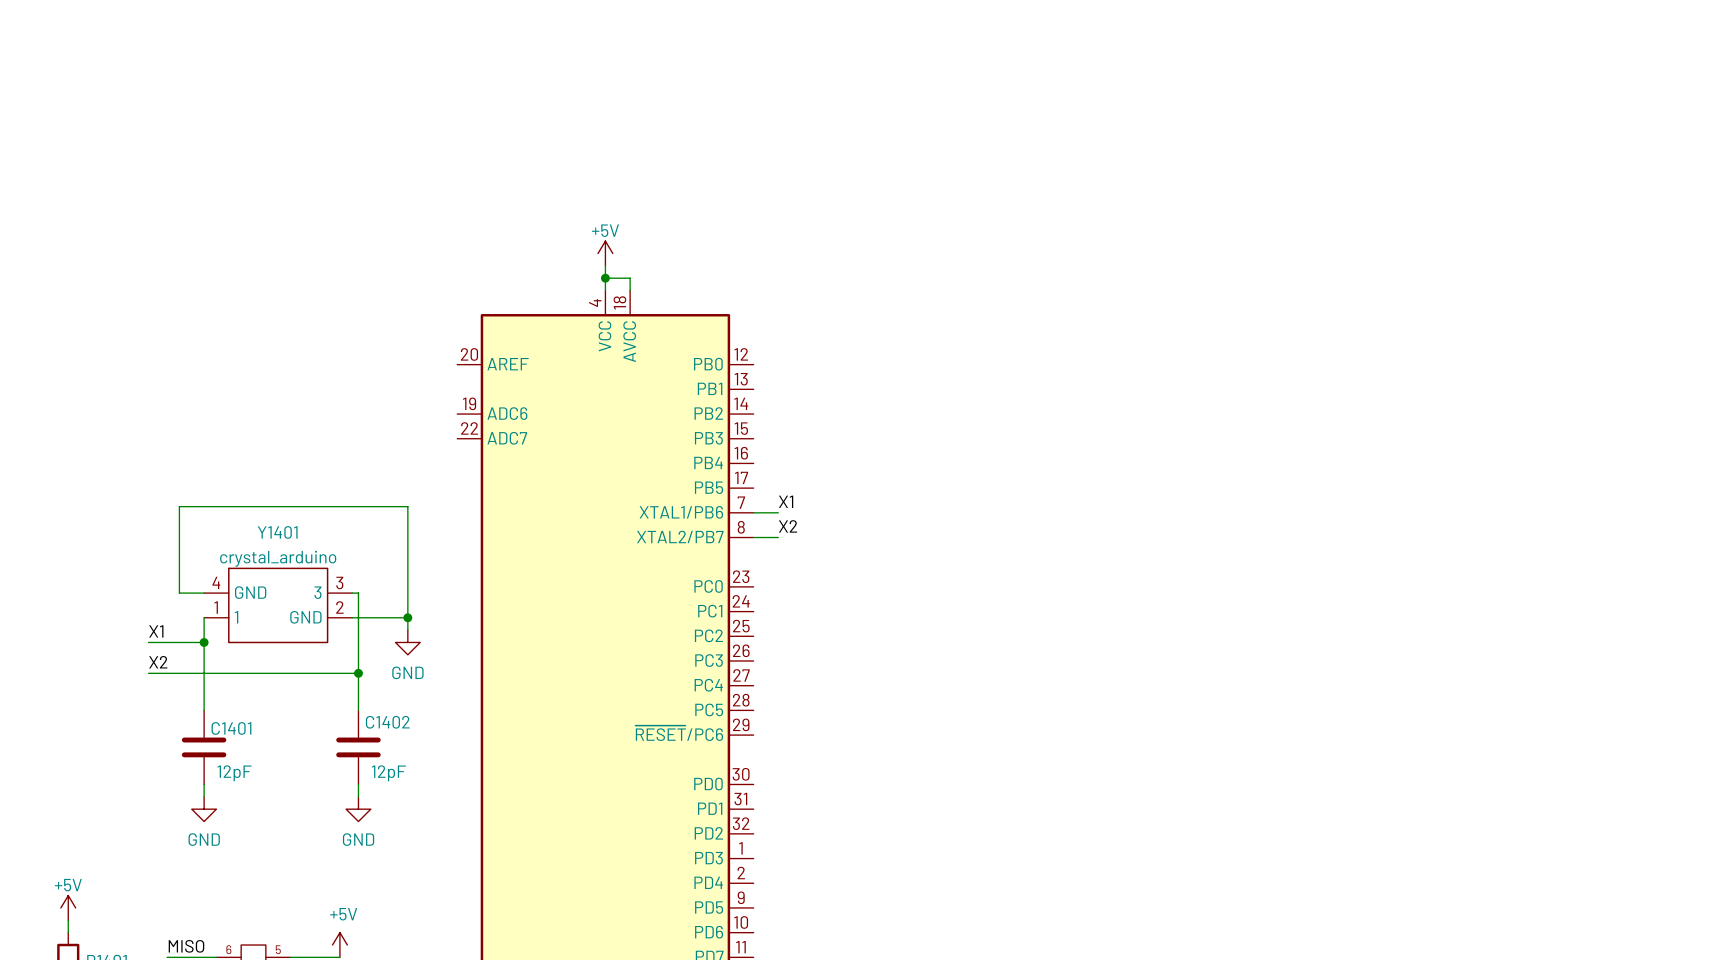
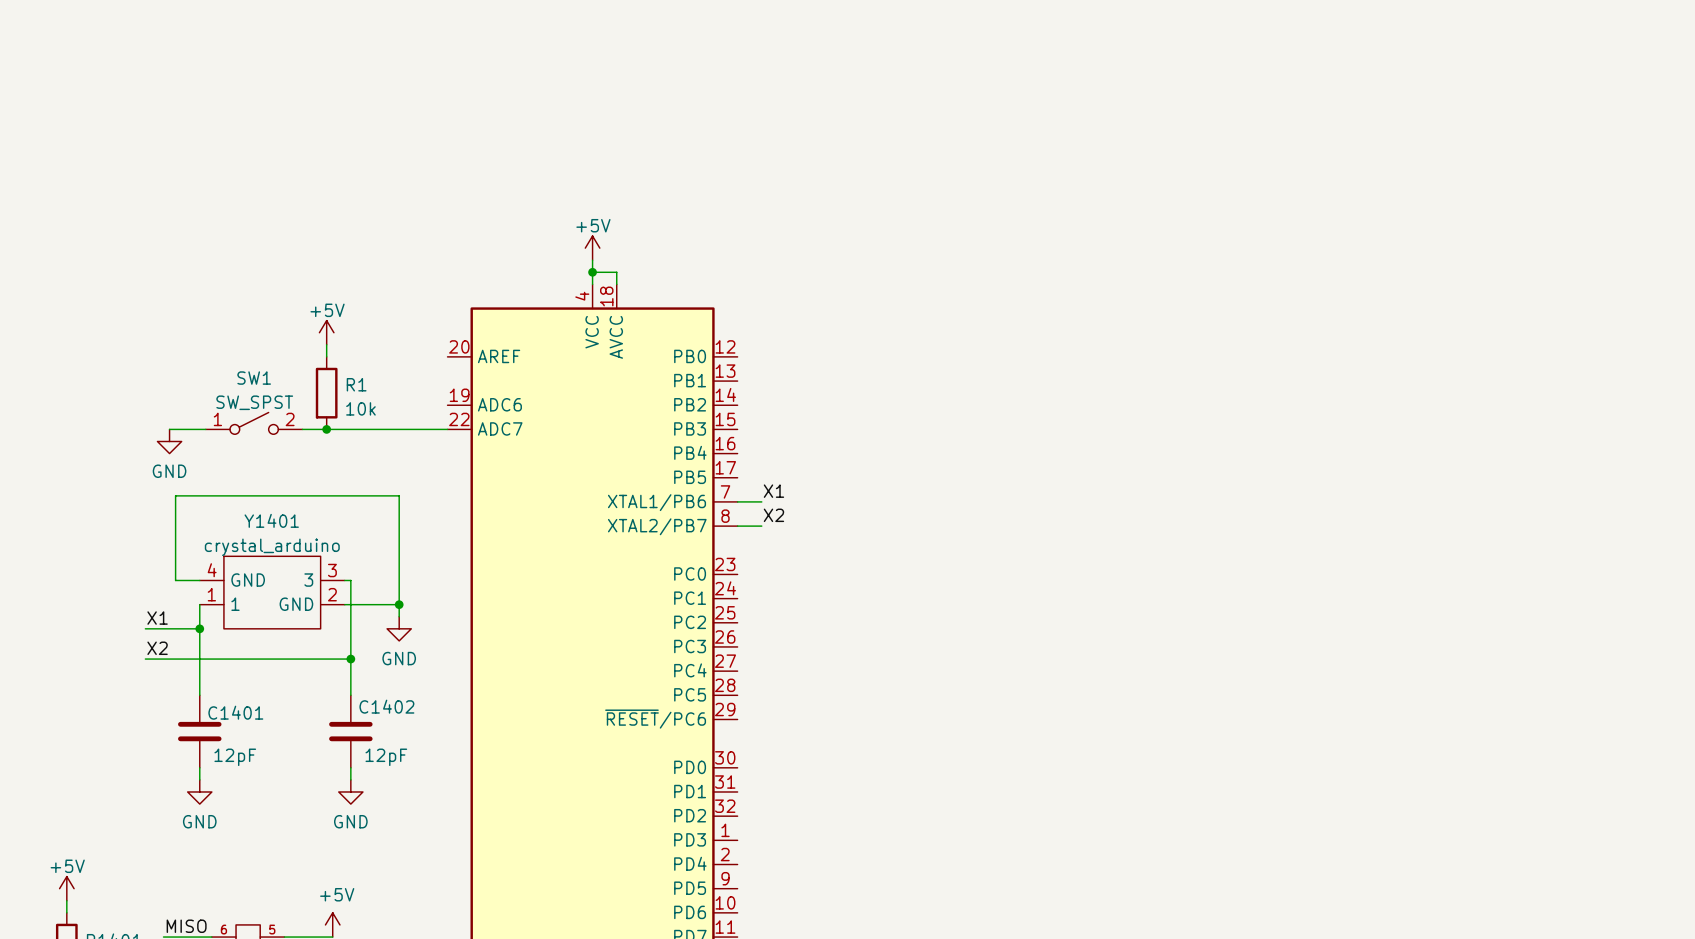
power symbol: none -> +5V (326, 332)
wire: none -> (326, 344) (326, 356)
R1: none -> 10k (326, 393)
SW1: none -> SW_SPST (254, 423)
wire: none -> (169, 429) (205, 429)
wire: none -> (302, 429) (447, 429)
junction: none -> (326, 429)
power symbol: none -> GND (169, 441)

